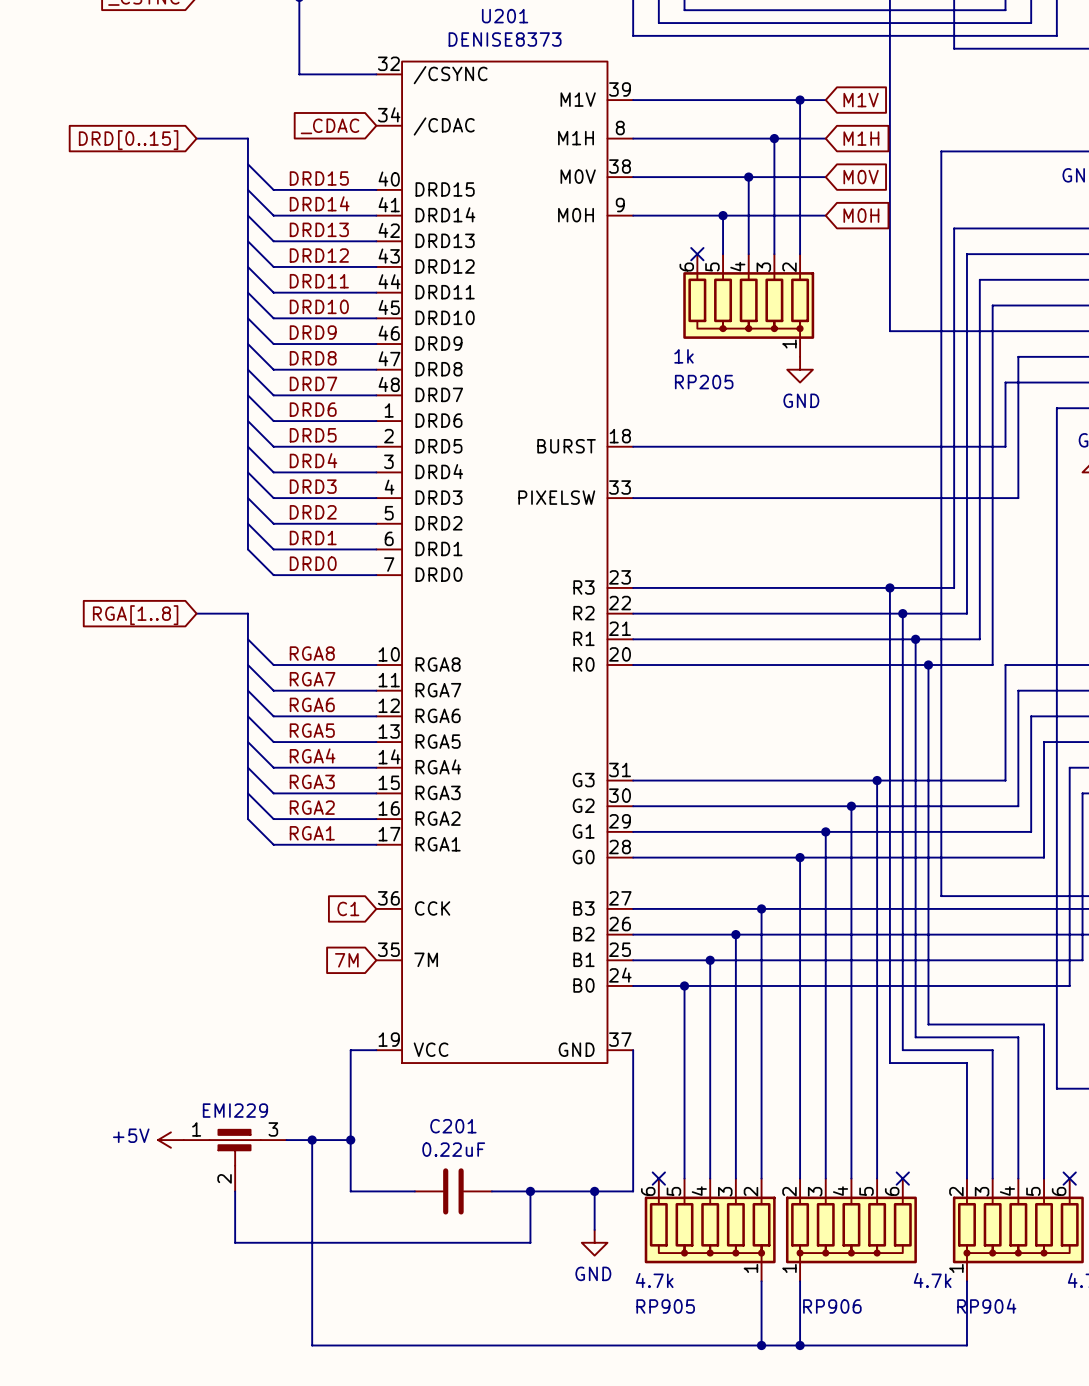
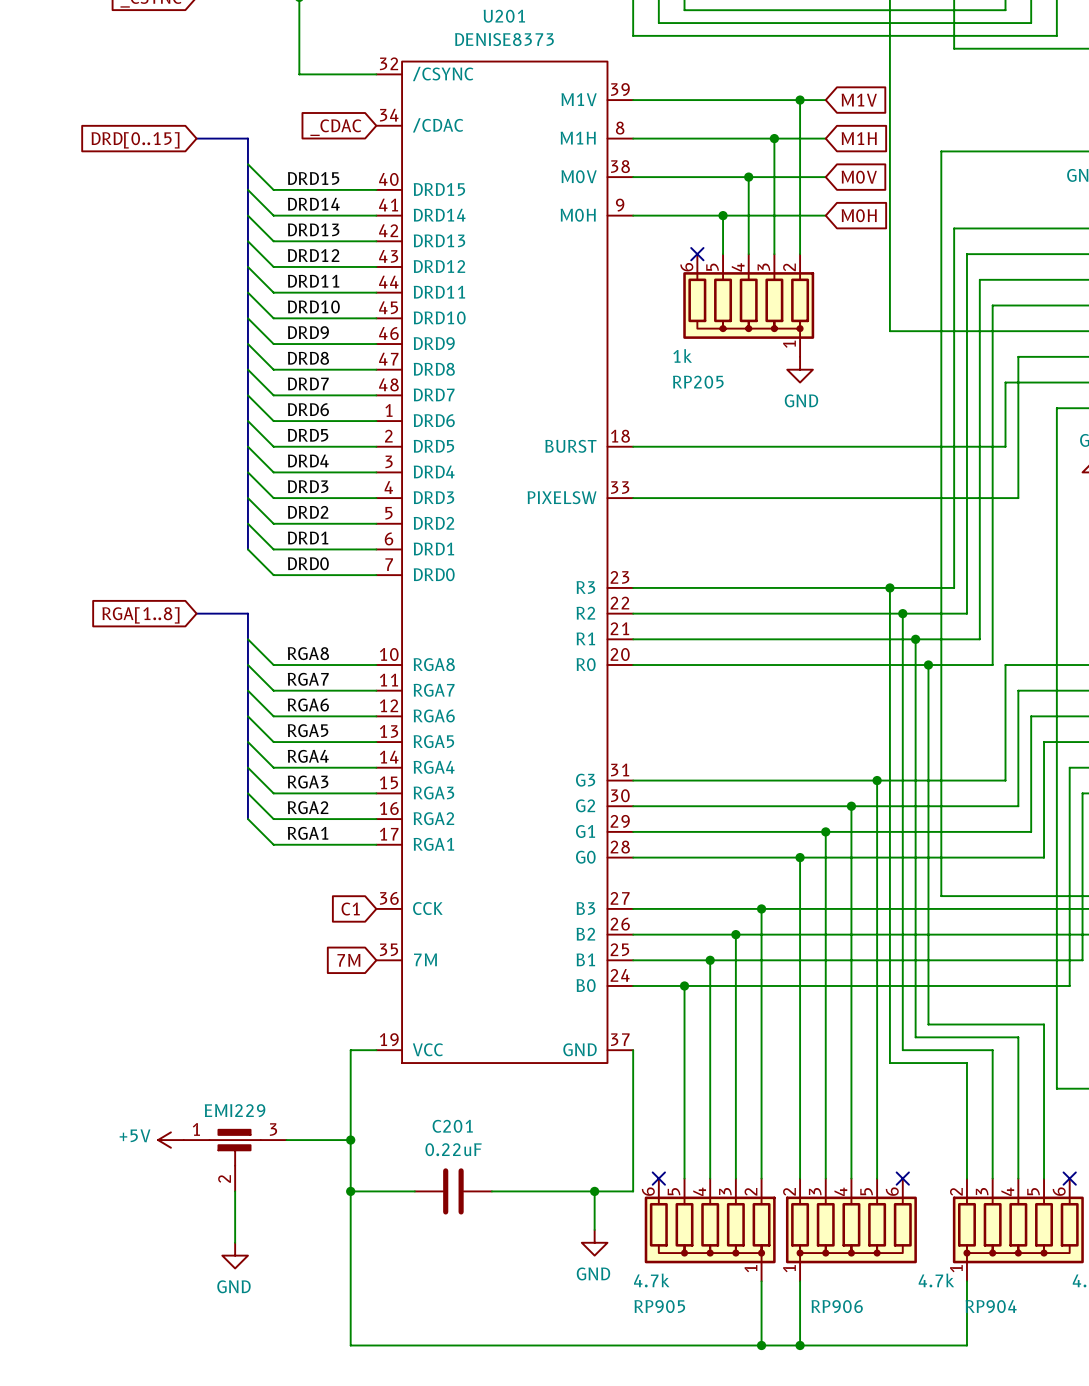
wire: (312, 1140) (312, 1345) (350, 1345) -> (350, 1191) (350, 1345)
junction: (312, 1140) -> none
junction: none -> (350, 1191)
wire: (530, 1191) (530, 1242) (235, 1242) -> none
junction: (530, 1191) -> none
power symbol: none -> GND (235, 1255)

